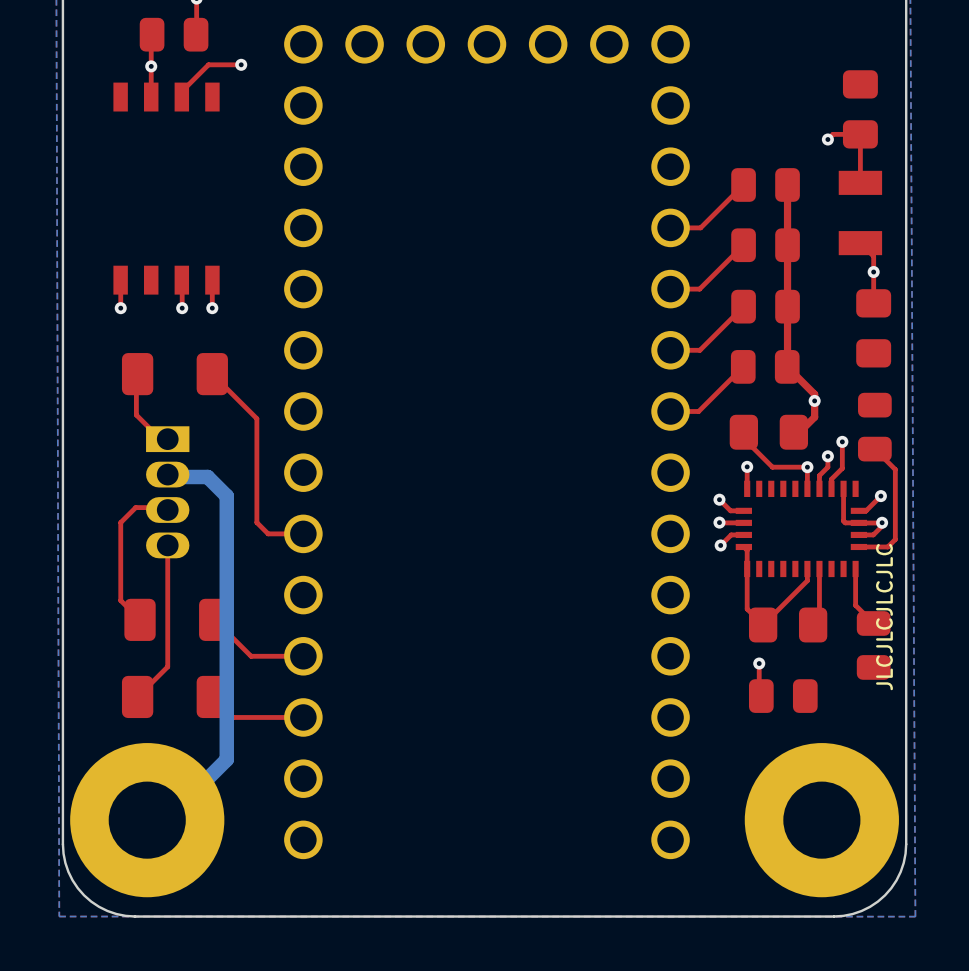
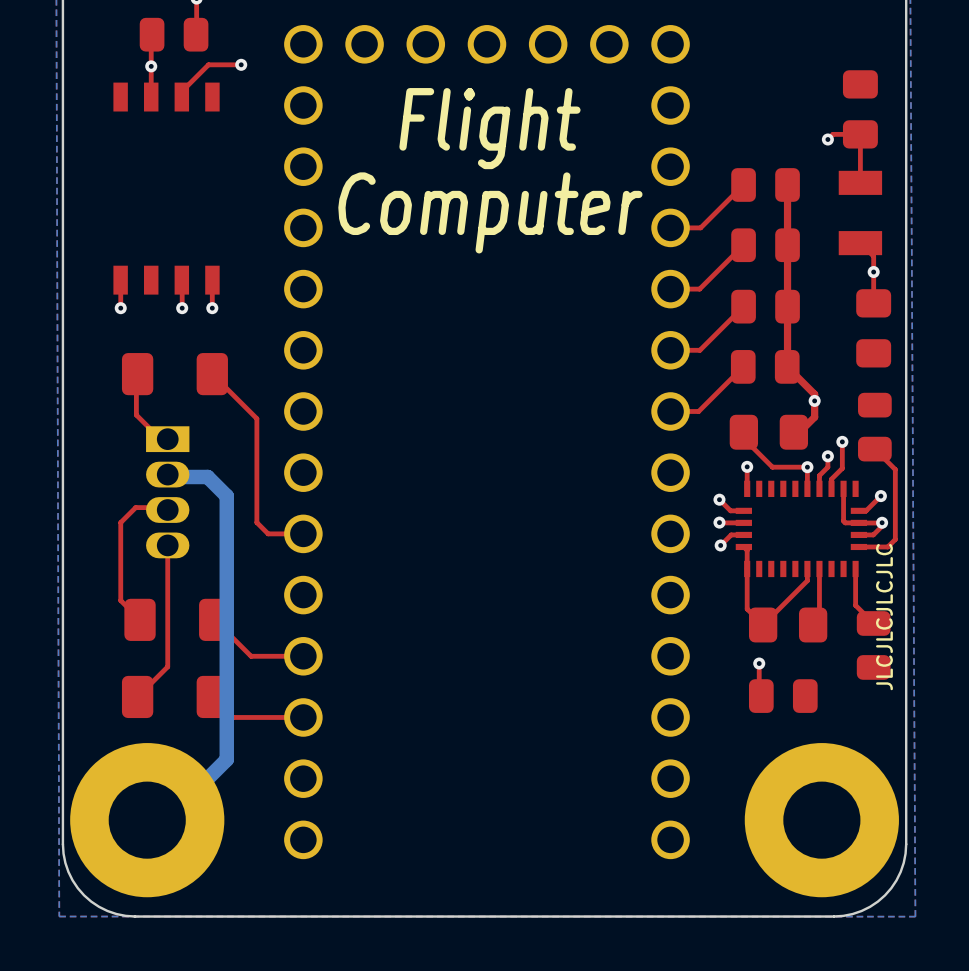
text: none -> Flight (489, 128)
text: none -> Computer (490, 212)

